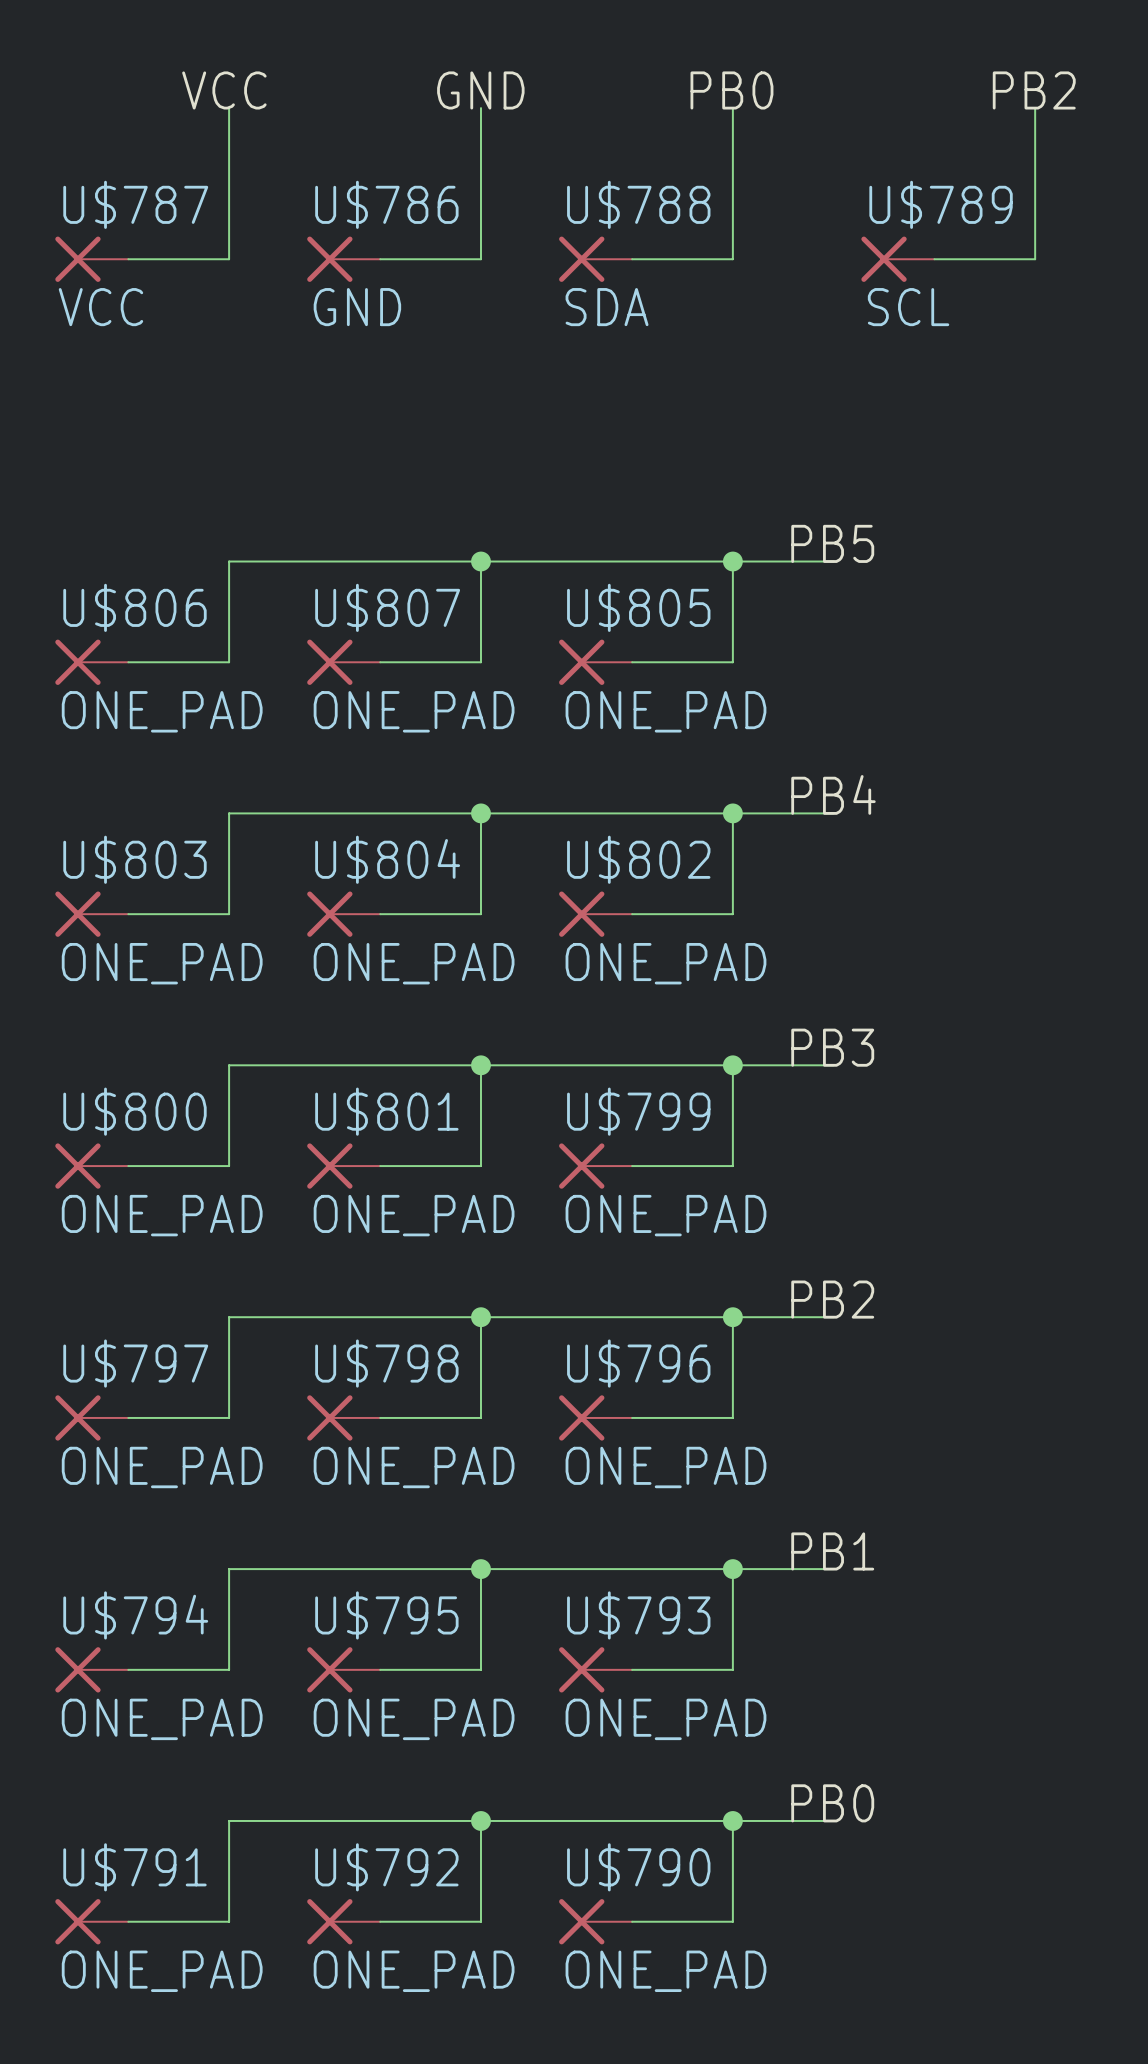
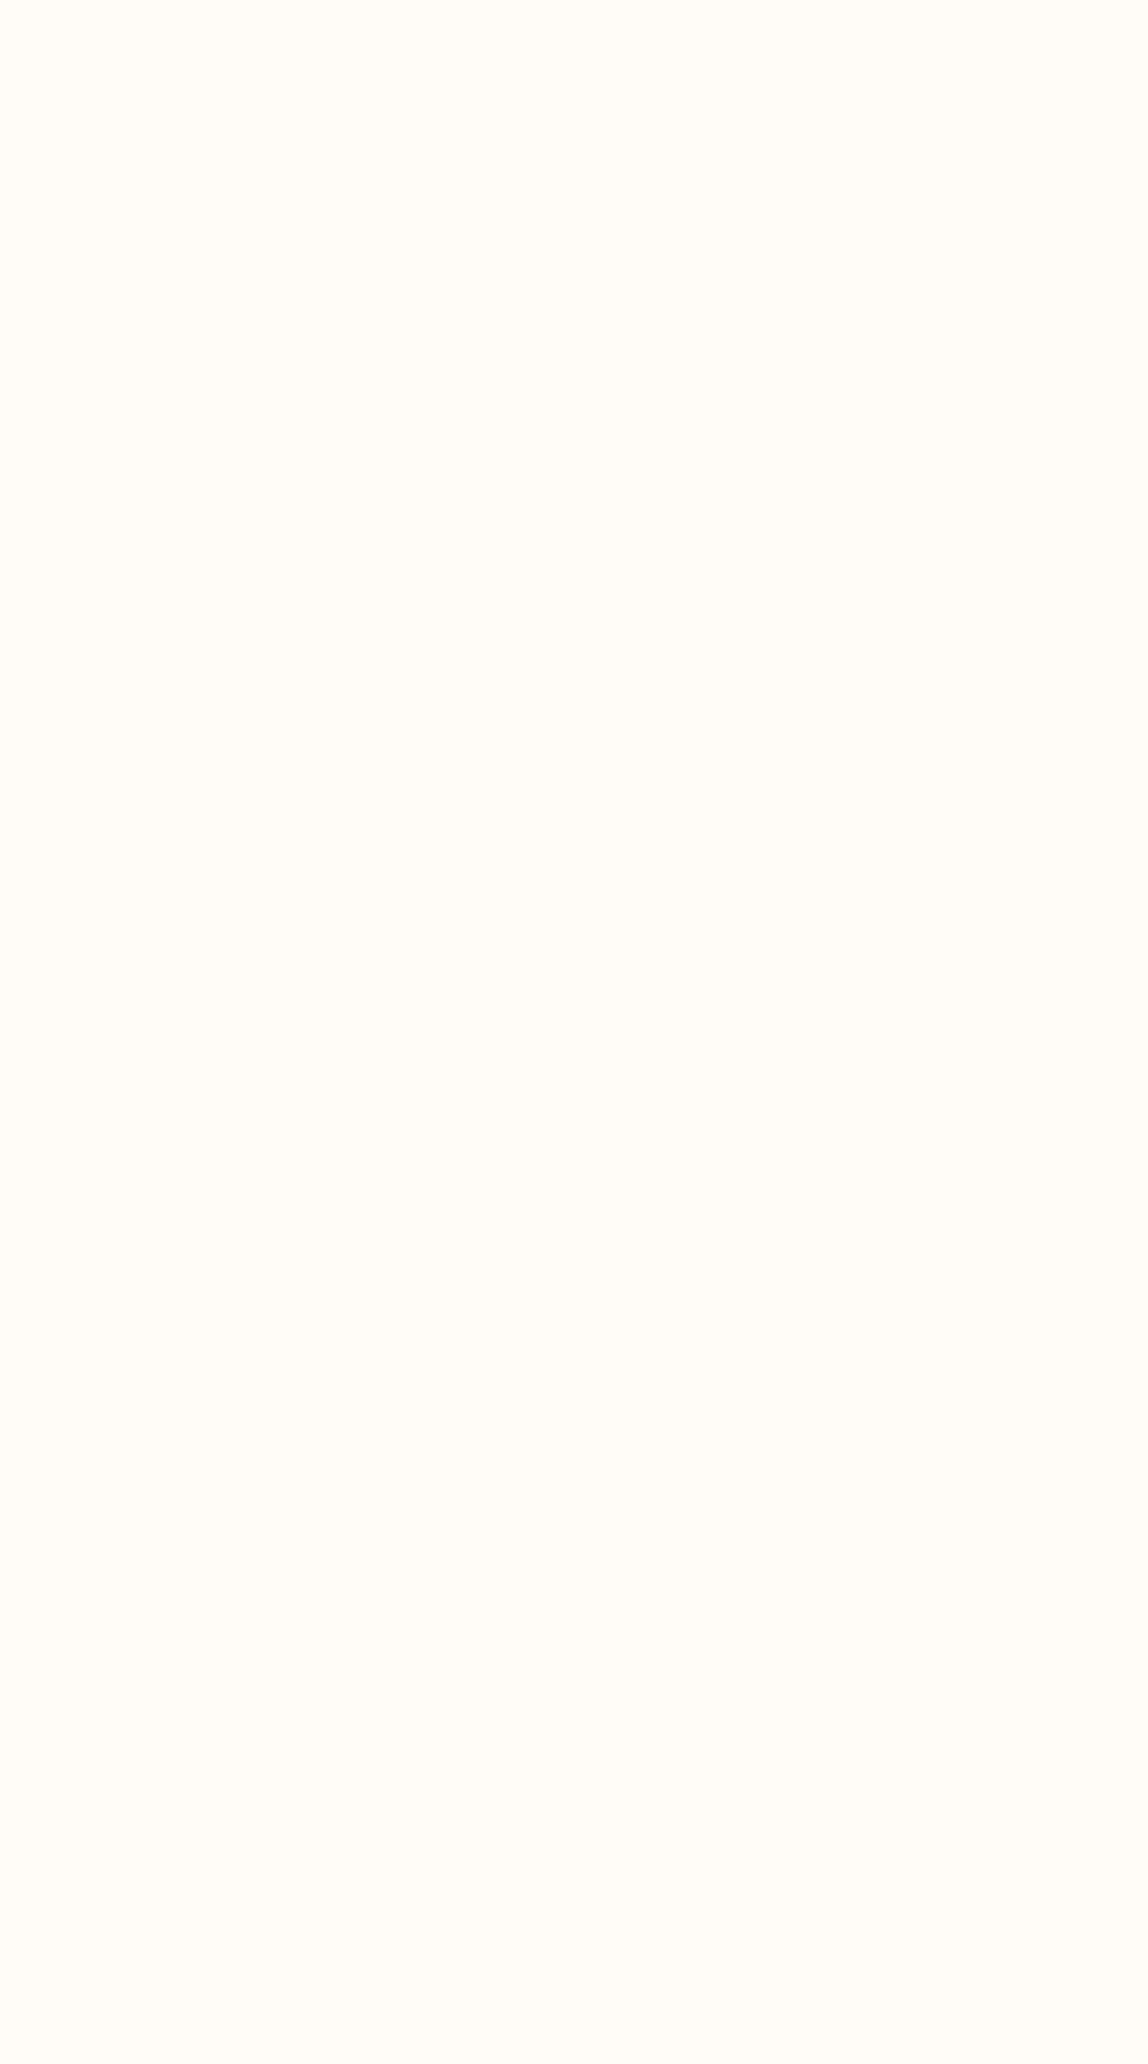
label: VCC (224, 90) -> none
label: GND (480, 90) -> none
label: PB0 (731, 90) -> none
label: PB2 (1034, 90) -> none
wire: (229, 108) (229, 259) (128, 259) -> none
wire: (480, 108) (480, 259) (380, 259) -> none
wire: (732, 108) (732, 259) (632, 259) -> none
wire: (1035, 108) (1035, 259) (934, 259) -> none
U$787: VCC (91, 259) -> none
U$786: GND (343, 259) -> none
U$788: SDA (595, 259) -> none
U$789: SCL (897, 259) -> none
label: PB5 (832, 543) -> none
wire: (480, 561) (480, 662) (380, 662) -> none
junction: (480, 561) -> none
wire: (732, 561) (732, 662) (632, 662) -> none
junction: (732, 561) -> none
wire: (833, 561) (229, 561) (229, 662) (128, 662) -> none
U$806: ONE_PAD (91, 662) -> none
U$807: ONE_PAD (343, 662) -> none
U$805: ONE_PAD (595, 662) -> none
label: PB4 (833, 794) -> none
wire: (480, 813) (480, 914) (380, 914) -> none
junction: (480, 813) -> none
wire: (732, 813) (732, 914) (632, 914) -> none
junction: (732, 813) -> none
wire: (833, 813) (229, 813) (229, 914) (128, 914) -> none
U$803: ONE_PAD (91, 914) -> none
U$804: ONE_PAD (343, 914) -> none
U$802: ONE_PAD (595, 914) -> none
label: PB3 (832, 1047) -> none
wire: (480, 1065) (480, 1166) (380, 1166) -> none
junction: (480, 1065) -> none
wire: (732, 1065) (732, 1166) (632, 1166) -> none
junction: (732, 1065) -> none
wire: (833, 1065) (229, 1065) (229, 1166) (128, 1166) -> none
U$800: ONE_PAD (91, 1166) -> none
U$801: ONE_PAD (343, 1166) -> none
U$799: ONE_PAD (595, 1166) -> none
label: PB2 (832, 1299) -> none
wire: (480, 1317) (480, 1417) (380, 1417) -> none
junction: (480, 1317) -> none
wire: (732, 1317) (732, 1417) (632, 1417) -> none
junction: (732, 1317) -> none
wire: (833, 1317) (229, 1317) (229, 1417) (128, 1417) -> none
U$797: ONE_PAD (91, 1417) -> none
U$798: ONE_PAD (343, 1417) -> none
U$796: ONE_PAD (595, 1417) -> none
label: PB1 (832, 1551) -> none
wire: (480, 1569) (480, 1669) (380, 1669) -> none
junction: (480, 1569) -> none
wire: (732, 1569) (732, 1669) (632, 1669) -> none
junction: (732, 1569) -> none
wire: (833, 1569) (229, 1569) (229, 1669) (128, 1669) -> none
U$794: ONE_PAD (91, 1669) -> none
U$795: ONE_PAD (343, 1669) -> none
U$793: ONE_PAD (595, 1669) -> none
label: PB0 (832, 1803) -> none
wire: (480, 1820) (480, 1921) (380, 1921) -> none
junction: (480, 1820) -> none
wire: (732, 1820) (732, 1921) (632, 1921) -> none
junction: (732, 1820) -> none
wire: (833, 1820) (229, 1820) (229, 1921) (128, 1921) -> none
U$791: ONE_PAD (91, 1921) -> none
U$792: ONE_PAD (343, 1921) -> none
U$790: ONE_PAD (595, 1921) -> none

